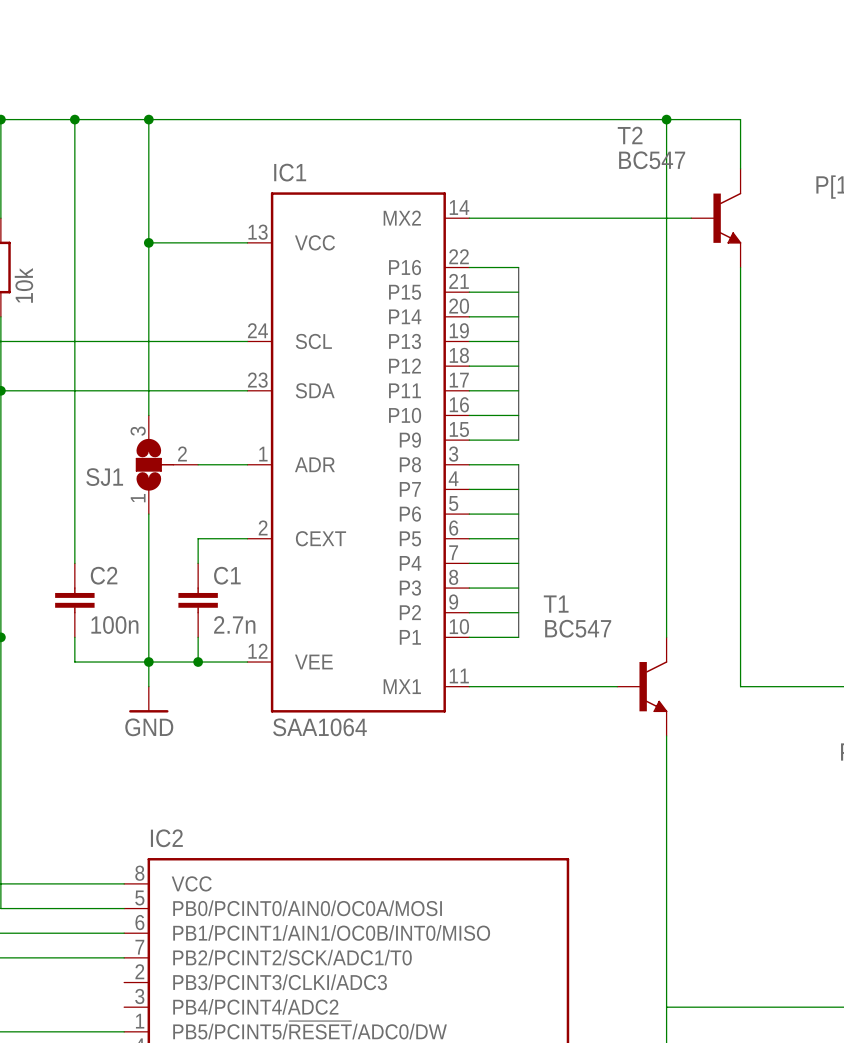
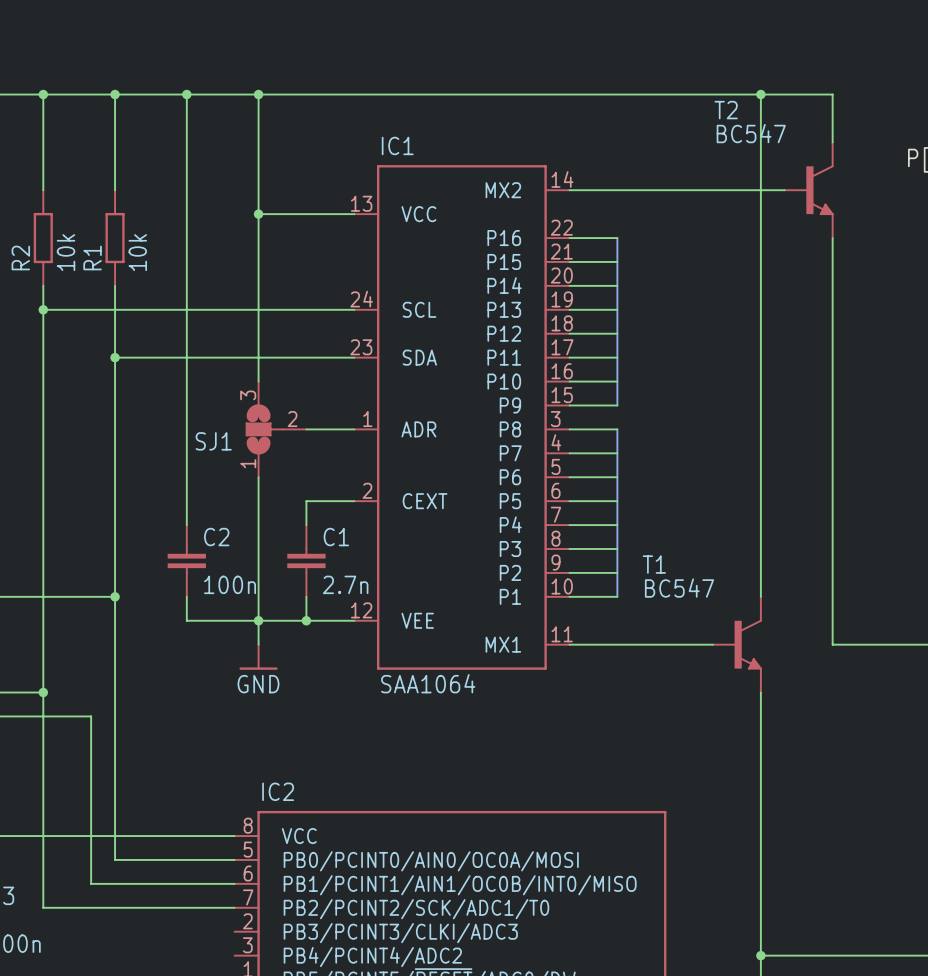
junction: none -> (760, 955)

